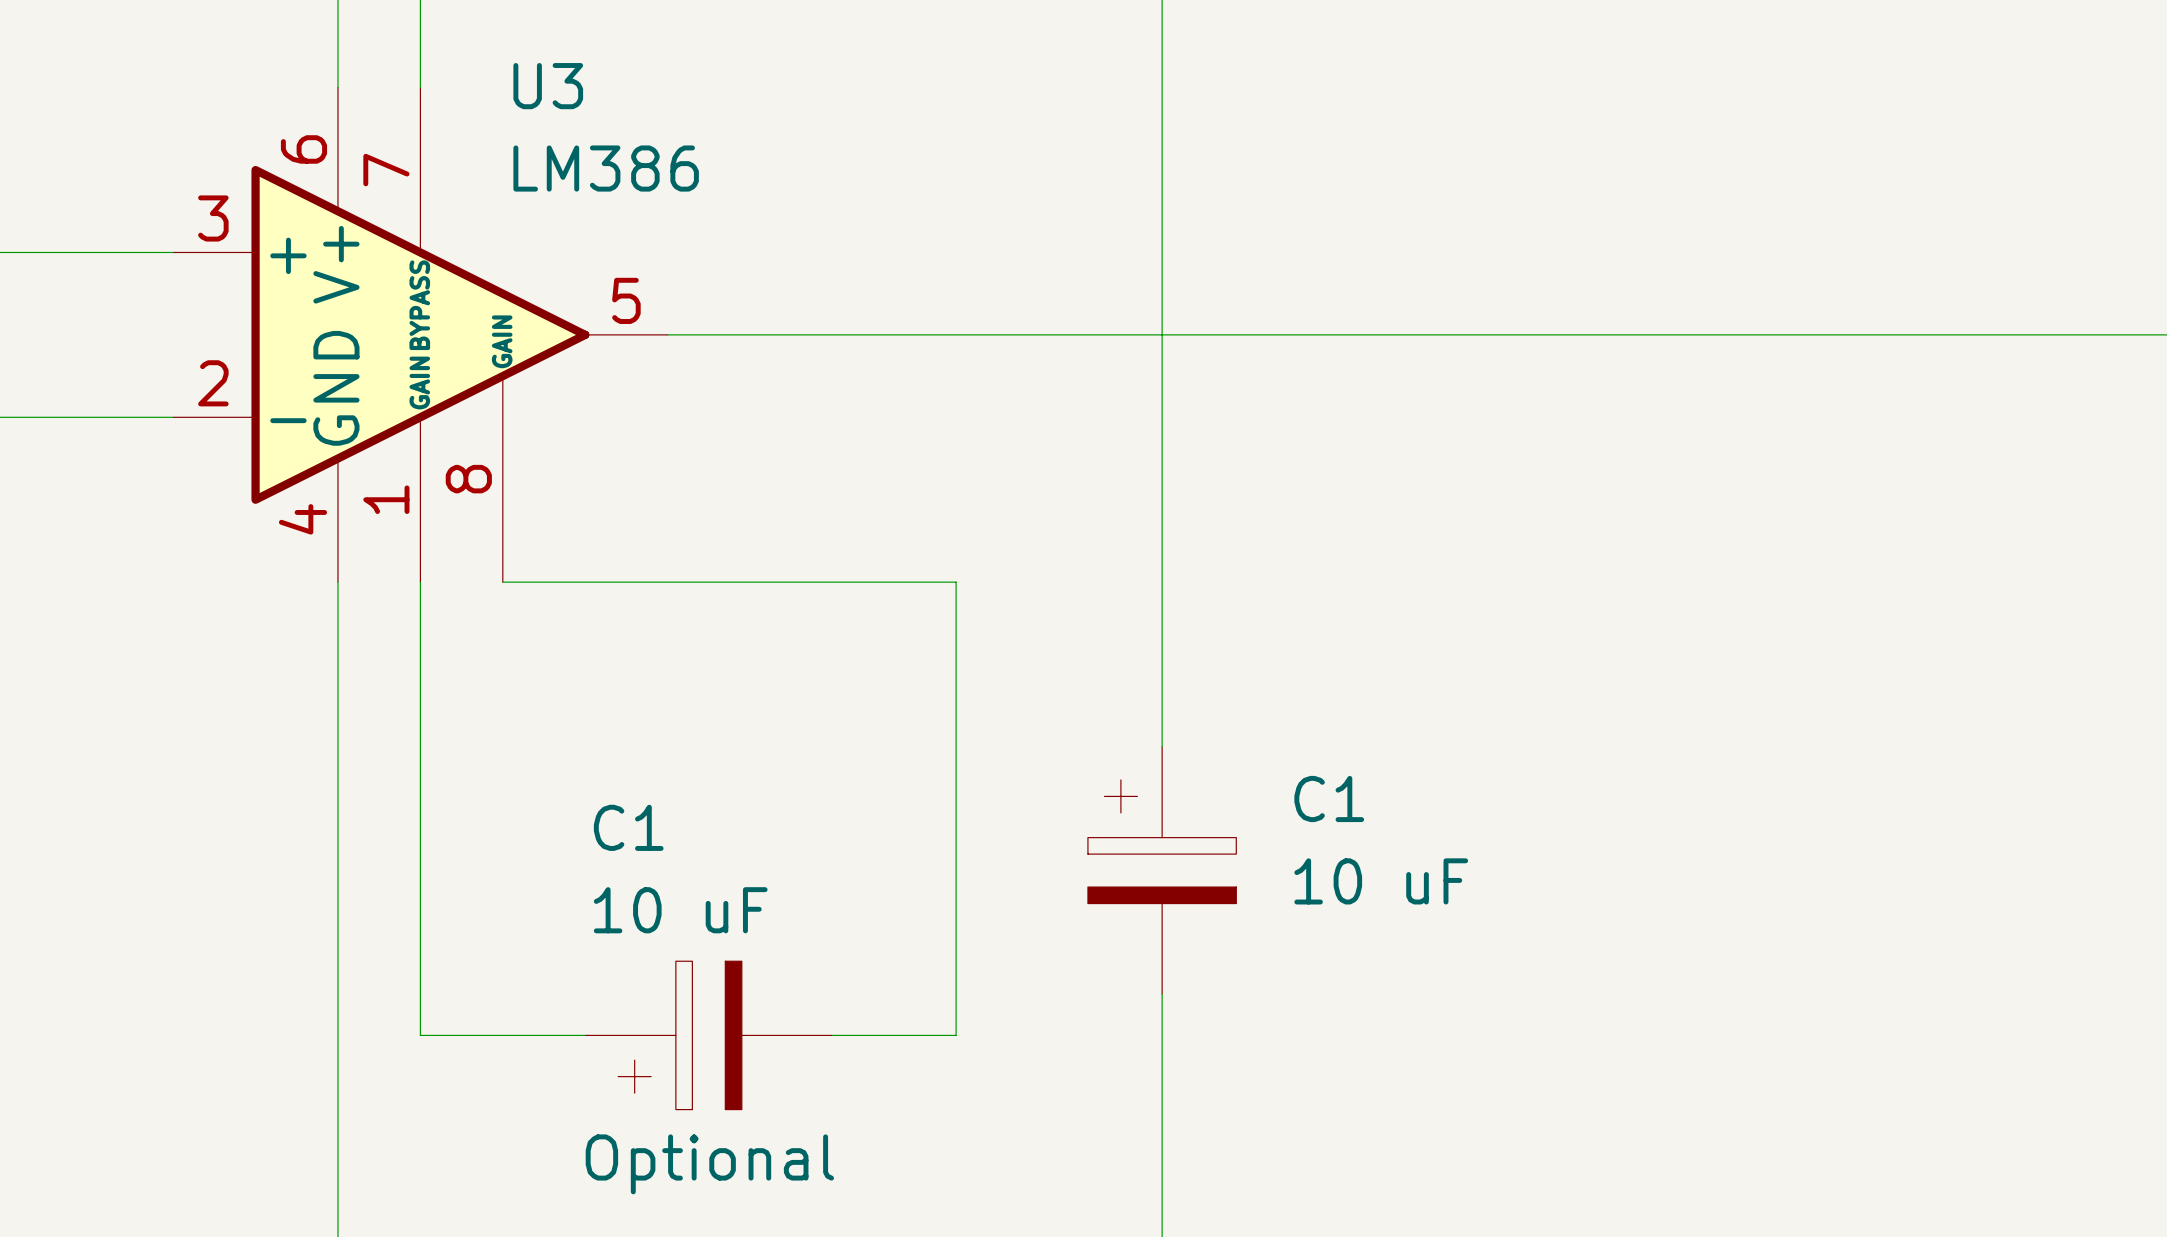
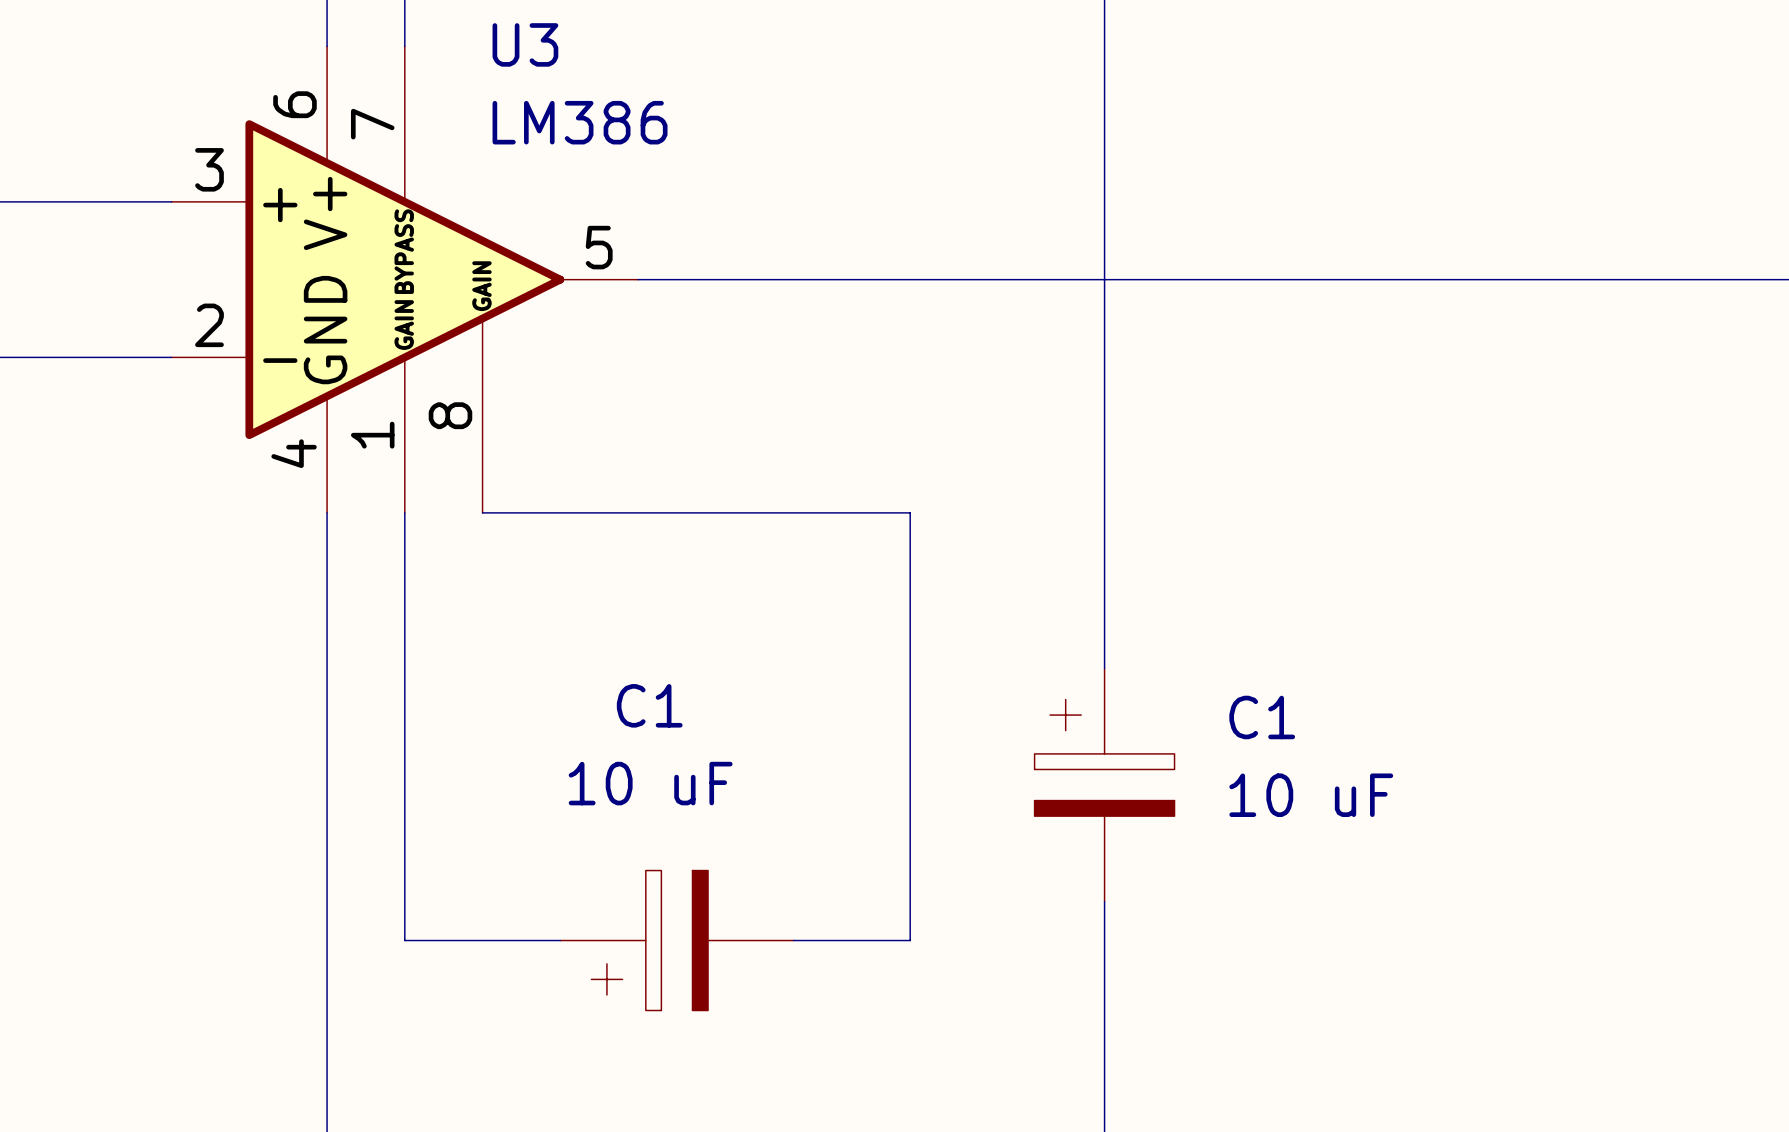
C1 name position: C1 (628, 827) -> C1 (649, 705)
C1 value position: 10 uF (680, 910) -> 10 uF (650, 783)
C1 text: Optional (709, 1164) -> none

